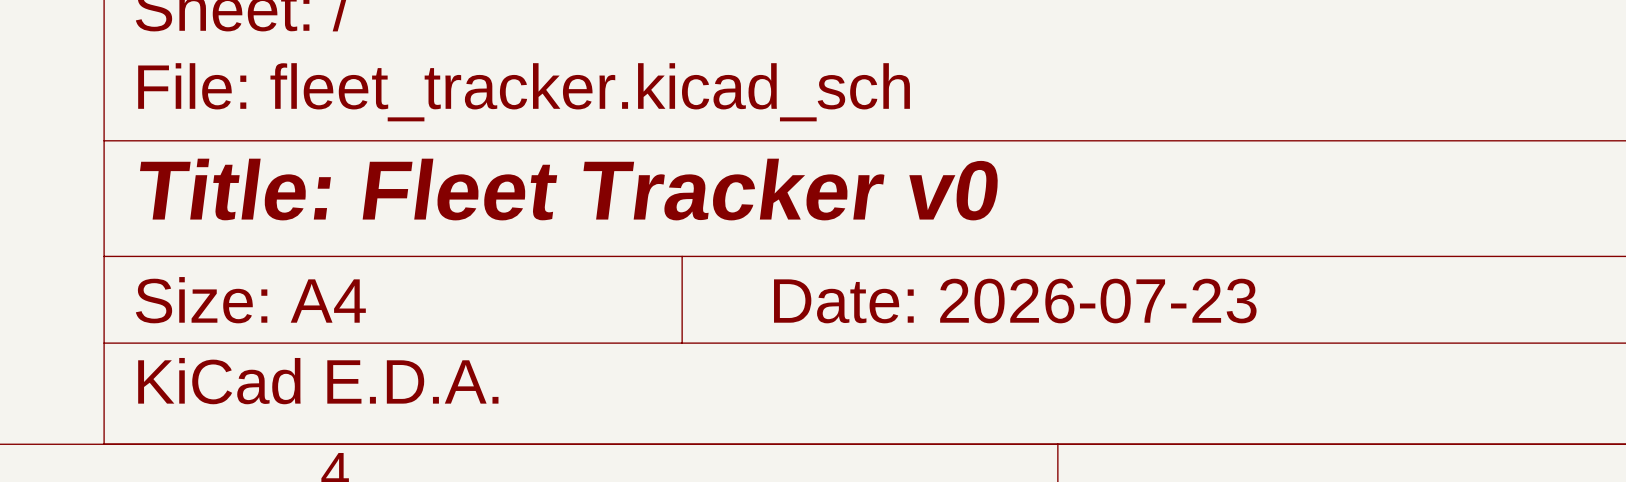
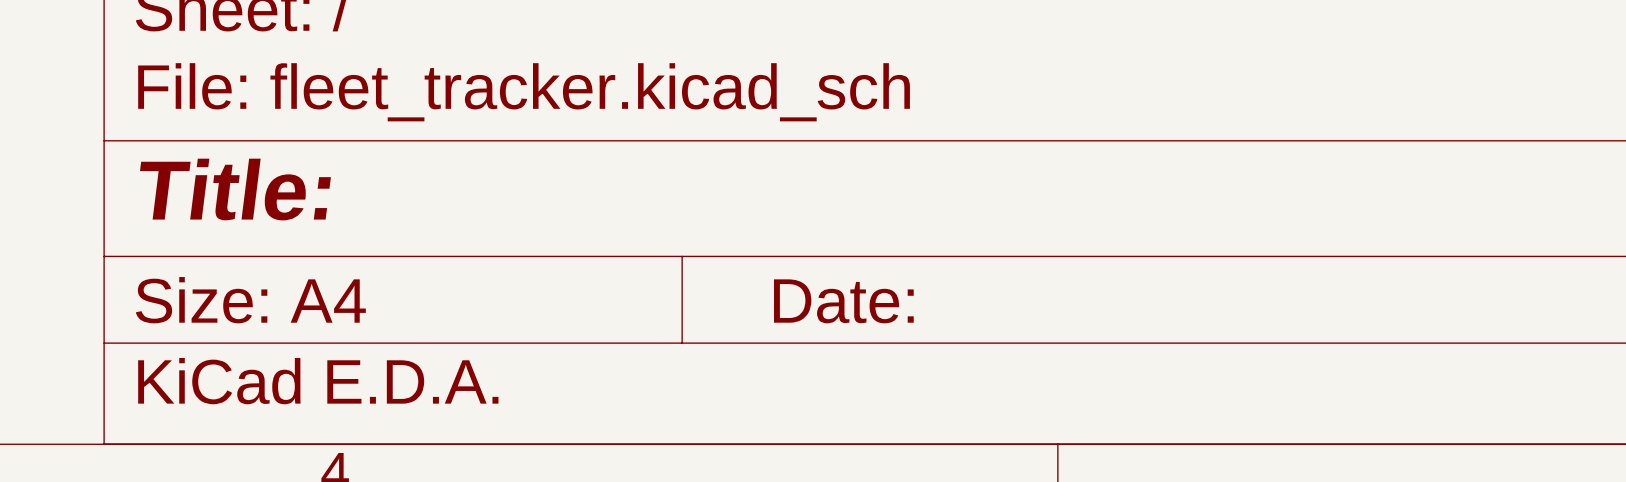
title block: Title: Fleet Tracker v0 (569, 189) -> Title: (235, 189)
title block: Date: 2026-07-23 (1015, 301) -> Date: (843, 301)

